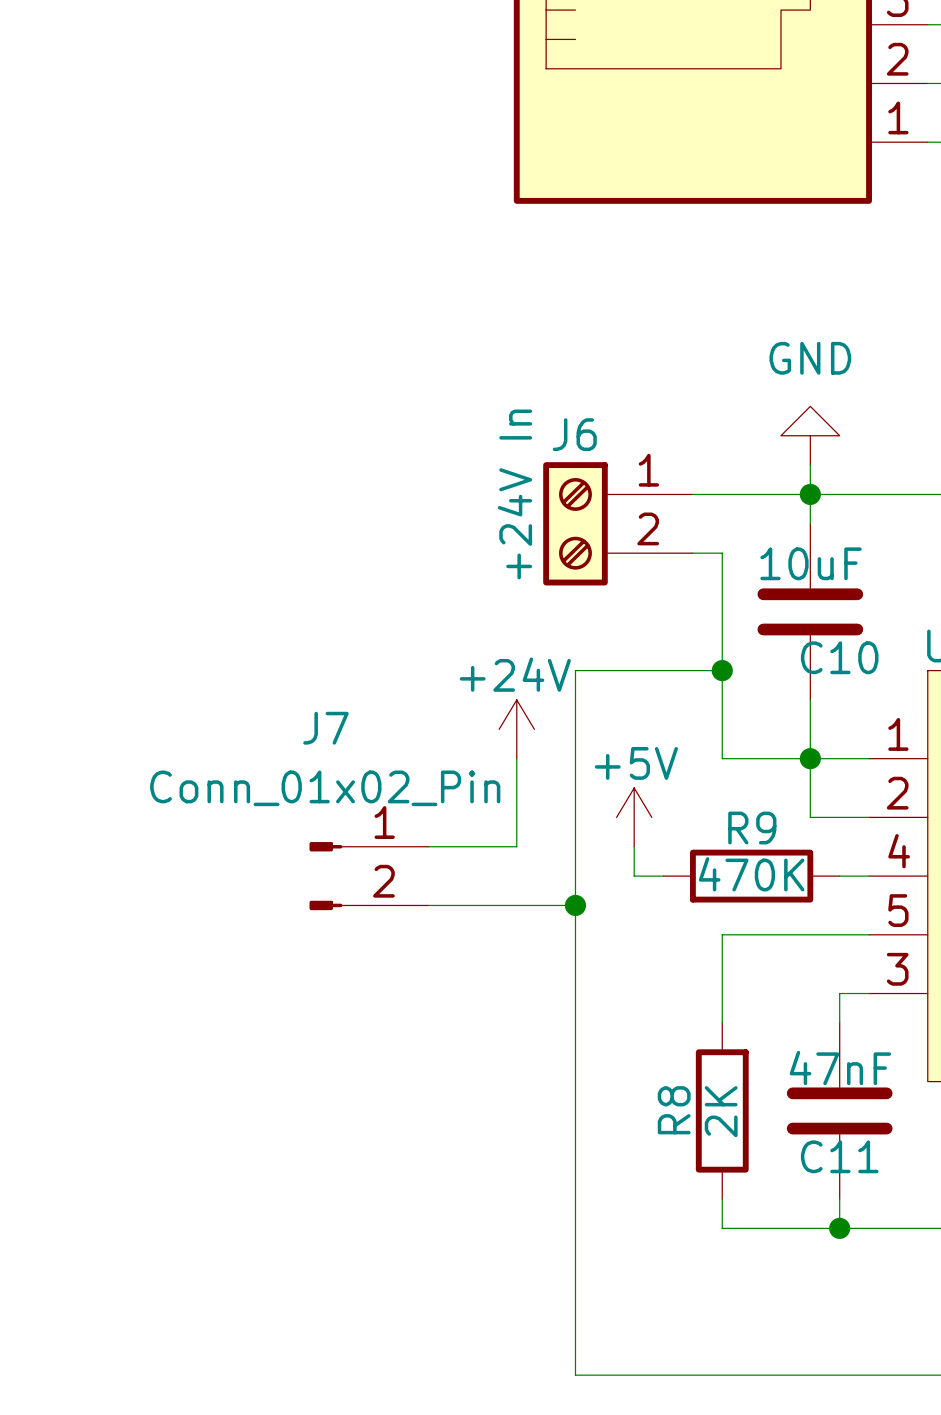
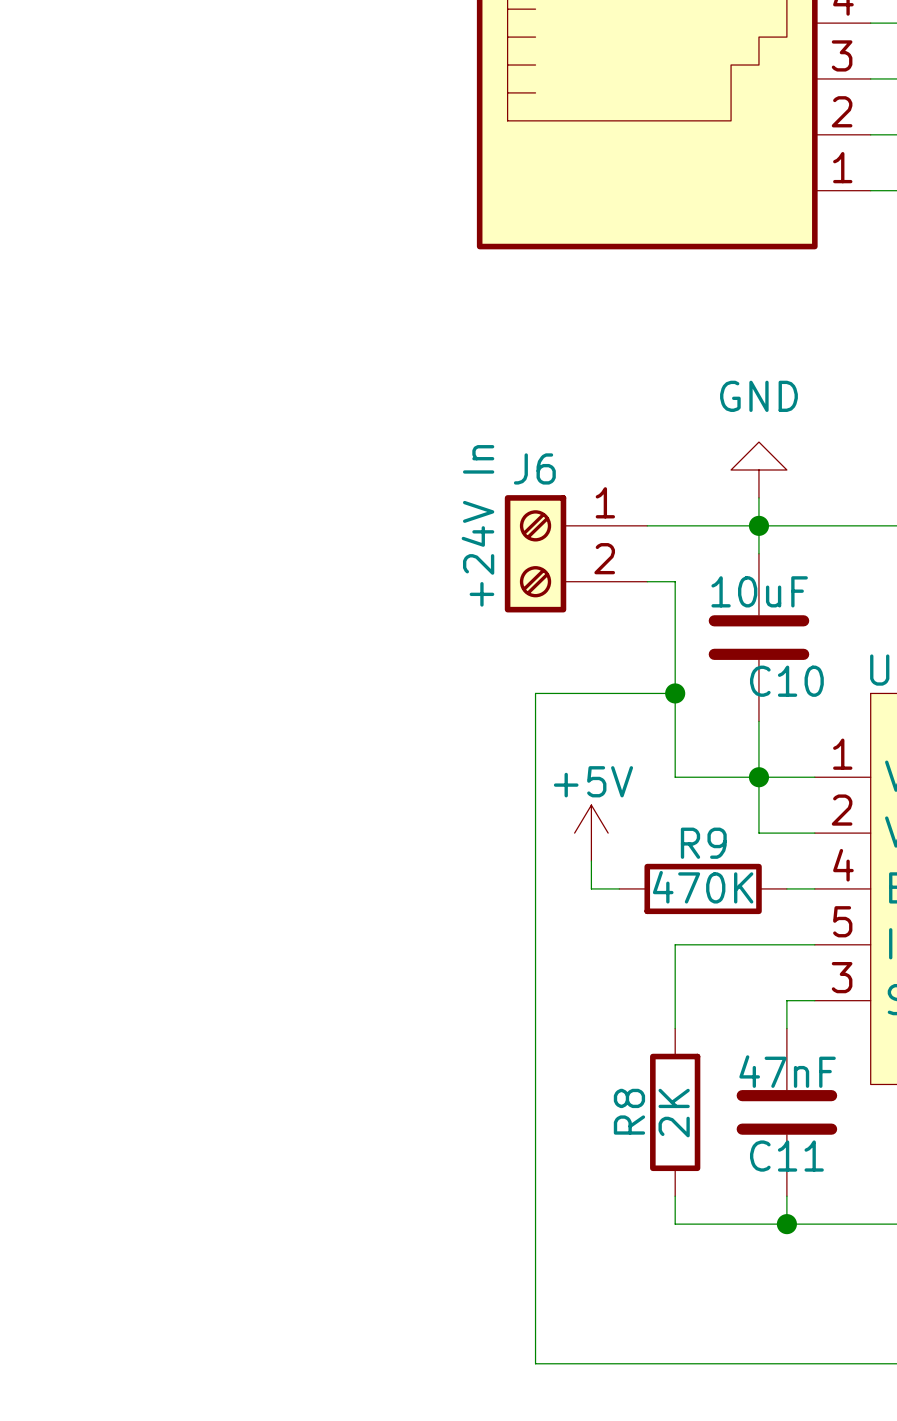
power symbol: +24V (516, 729) -> none
wire: (516, 758) (516, 846) (428, 846) -> none
J7: Conn_01x02_Pin (369, 876) -> none
wire: (428, 905) (575, 905) -> none
junction: (575, 905) -> none

